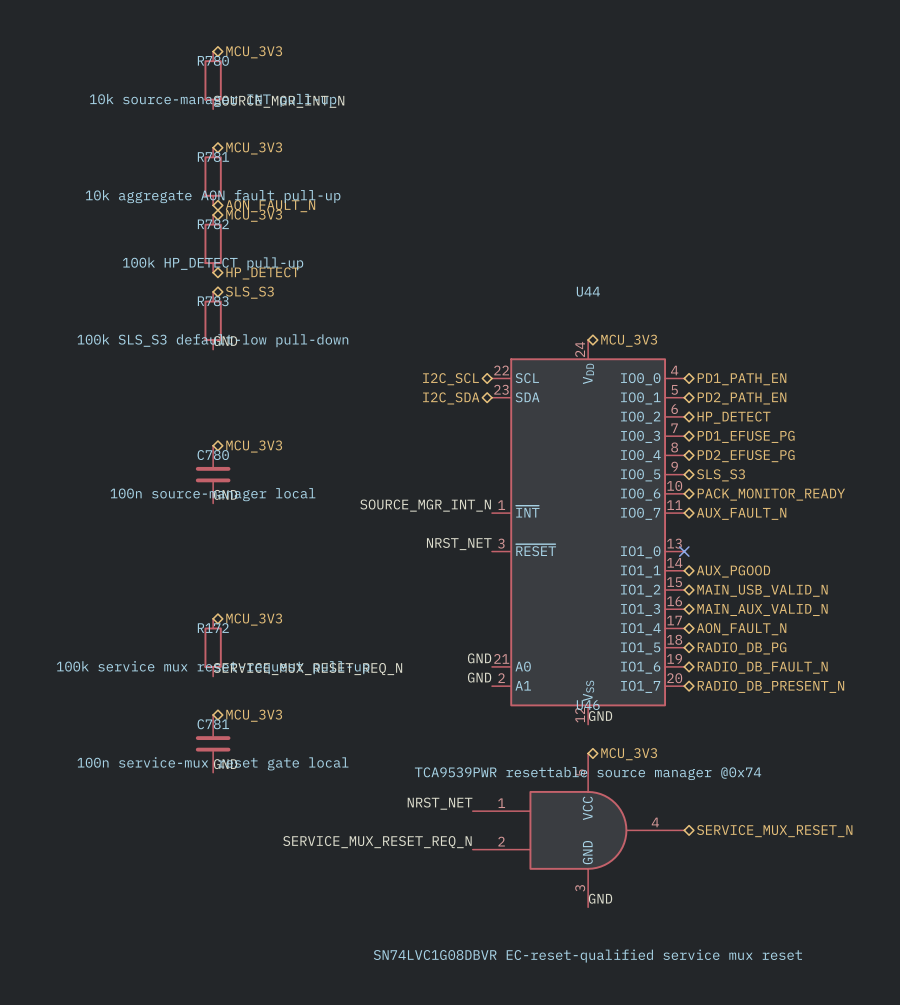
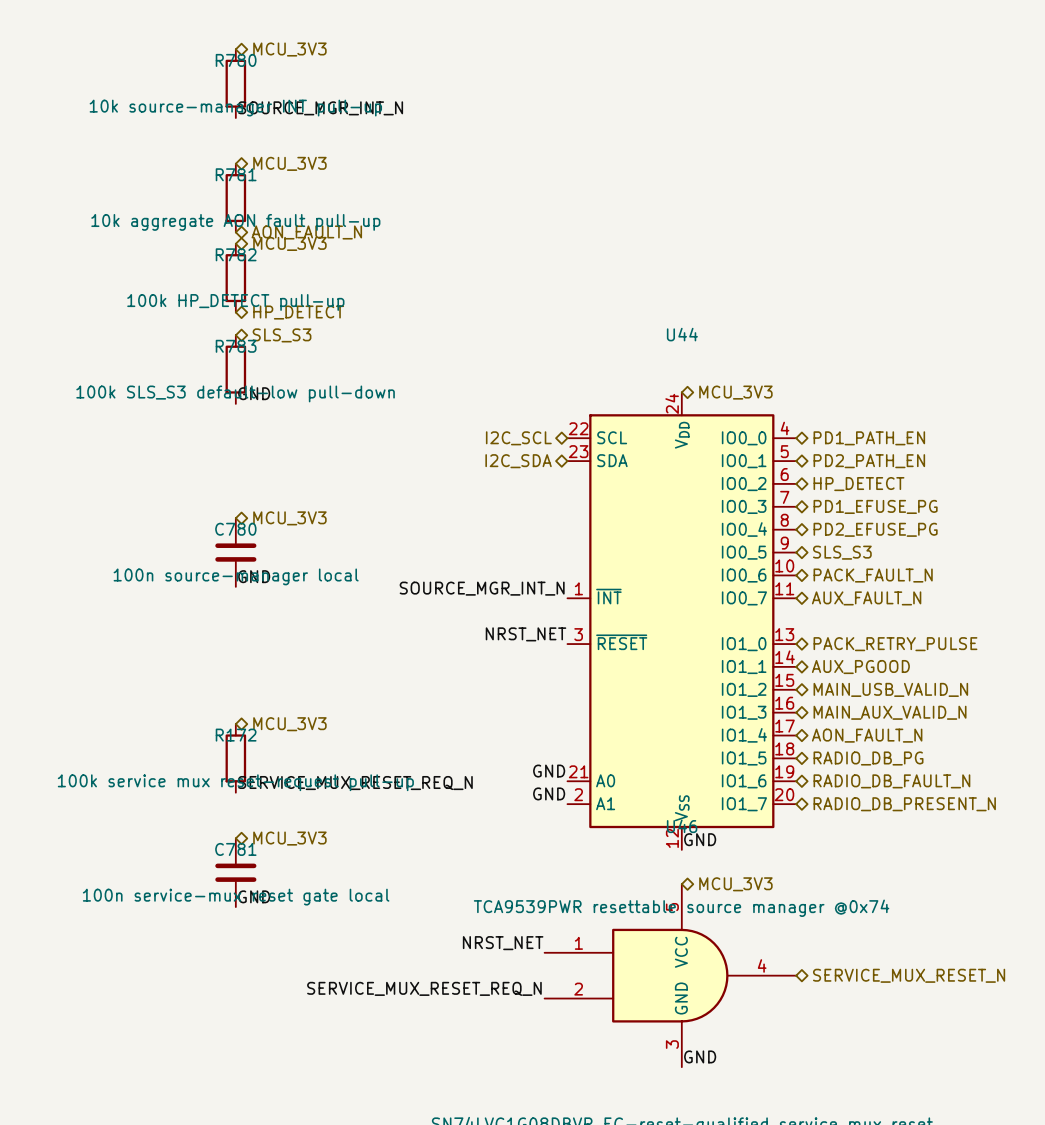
hierarchical label: PACK_MONITOR_READY (771, 494) -> PACK_FAULT_N (873, 575)
no-connect mark: (684, 551) -> none
hierarchical label: none -> PACK_RETRY_PULSE (895, 644)

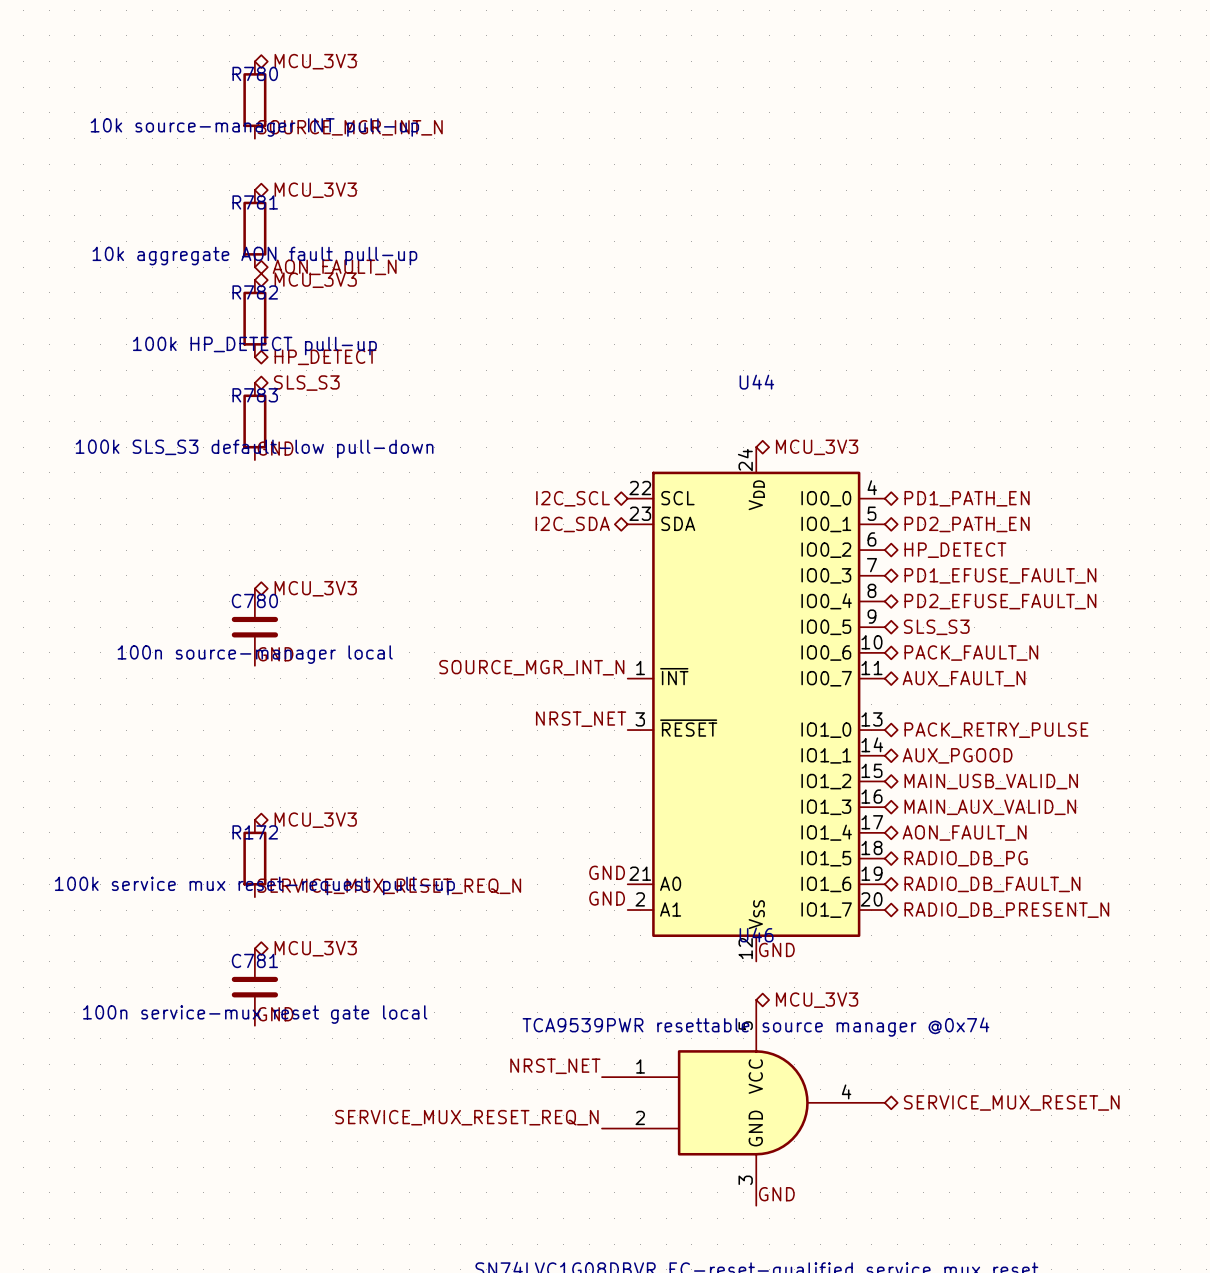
hierarchical label: PD1_EFUSE_PG (875, 506) -> PD1_EFUSE_FAULT_N (1000, 575)
hierarchical label: PD2_EFUSE_PG (875, 529) -> PD2_EFUSE_FAULT_N (1000, 601)

